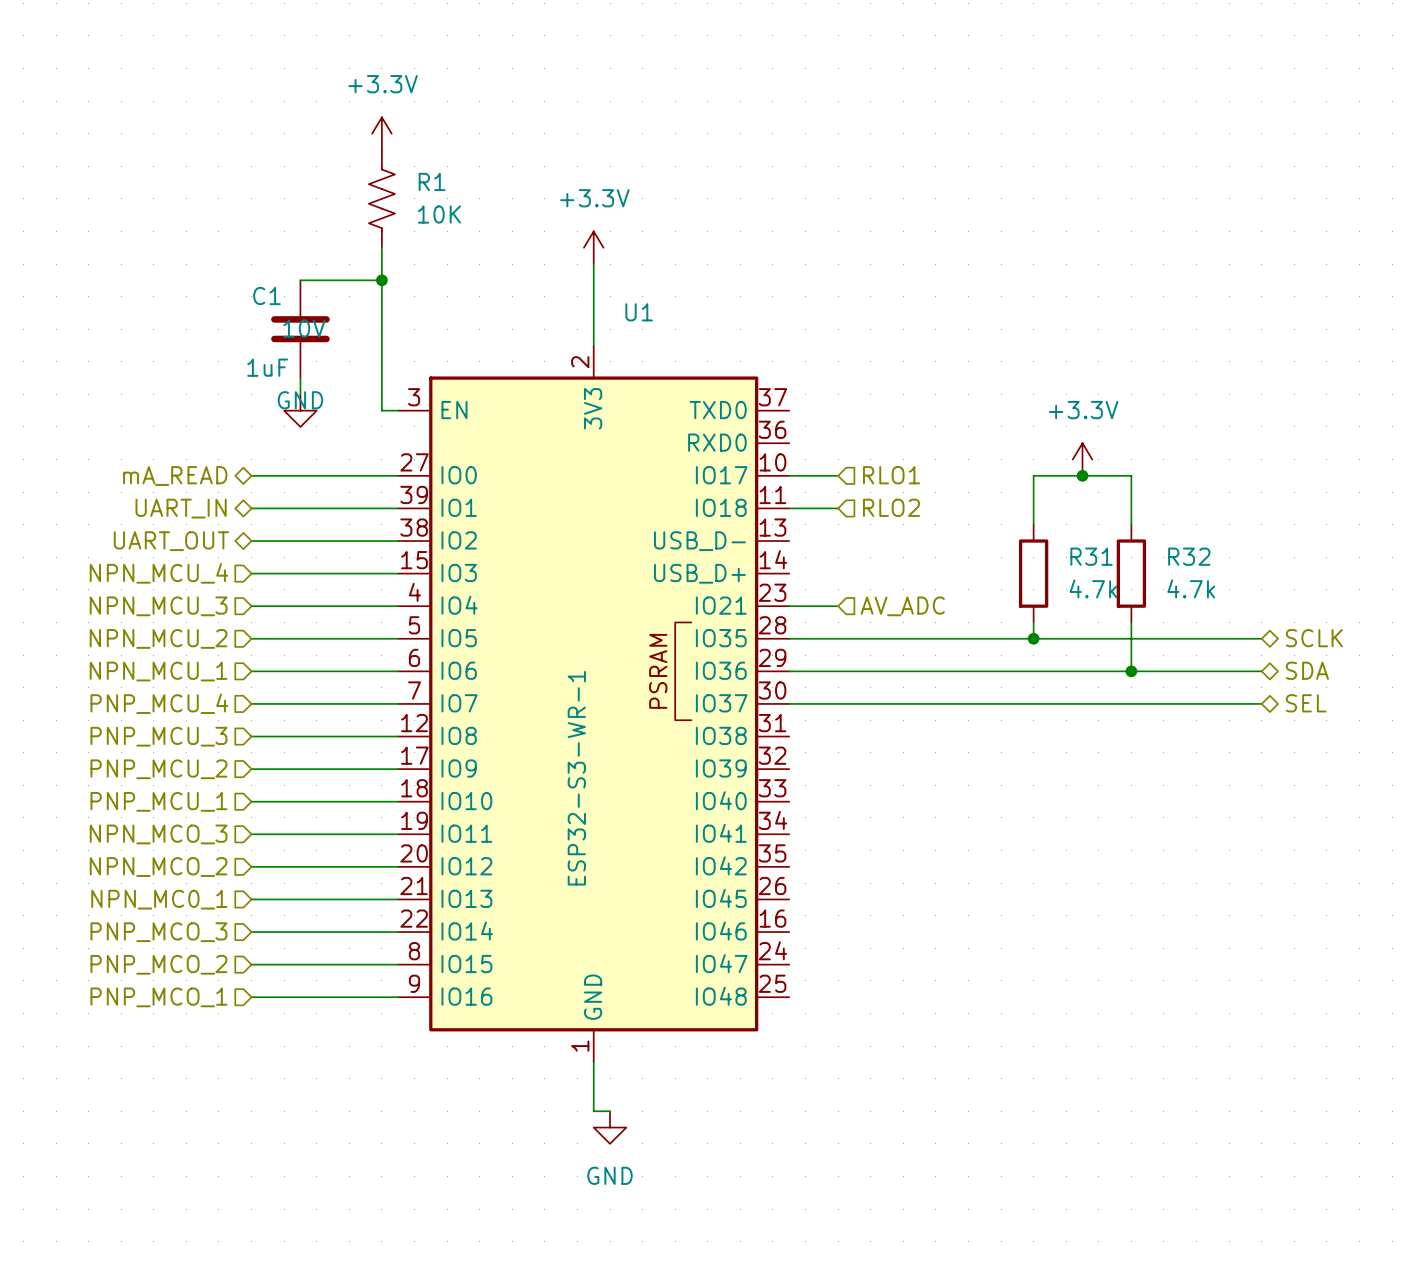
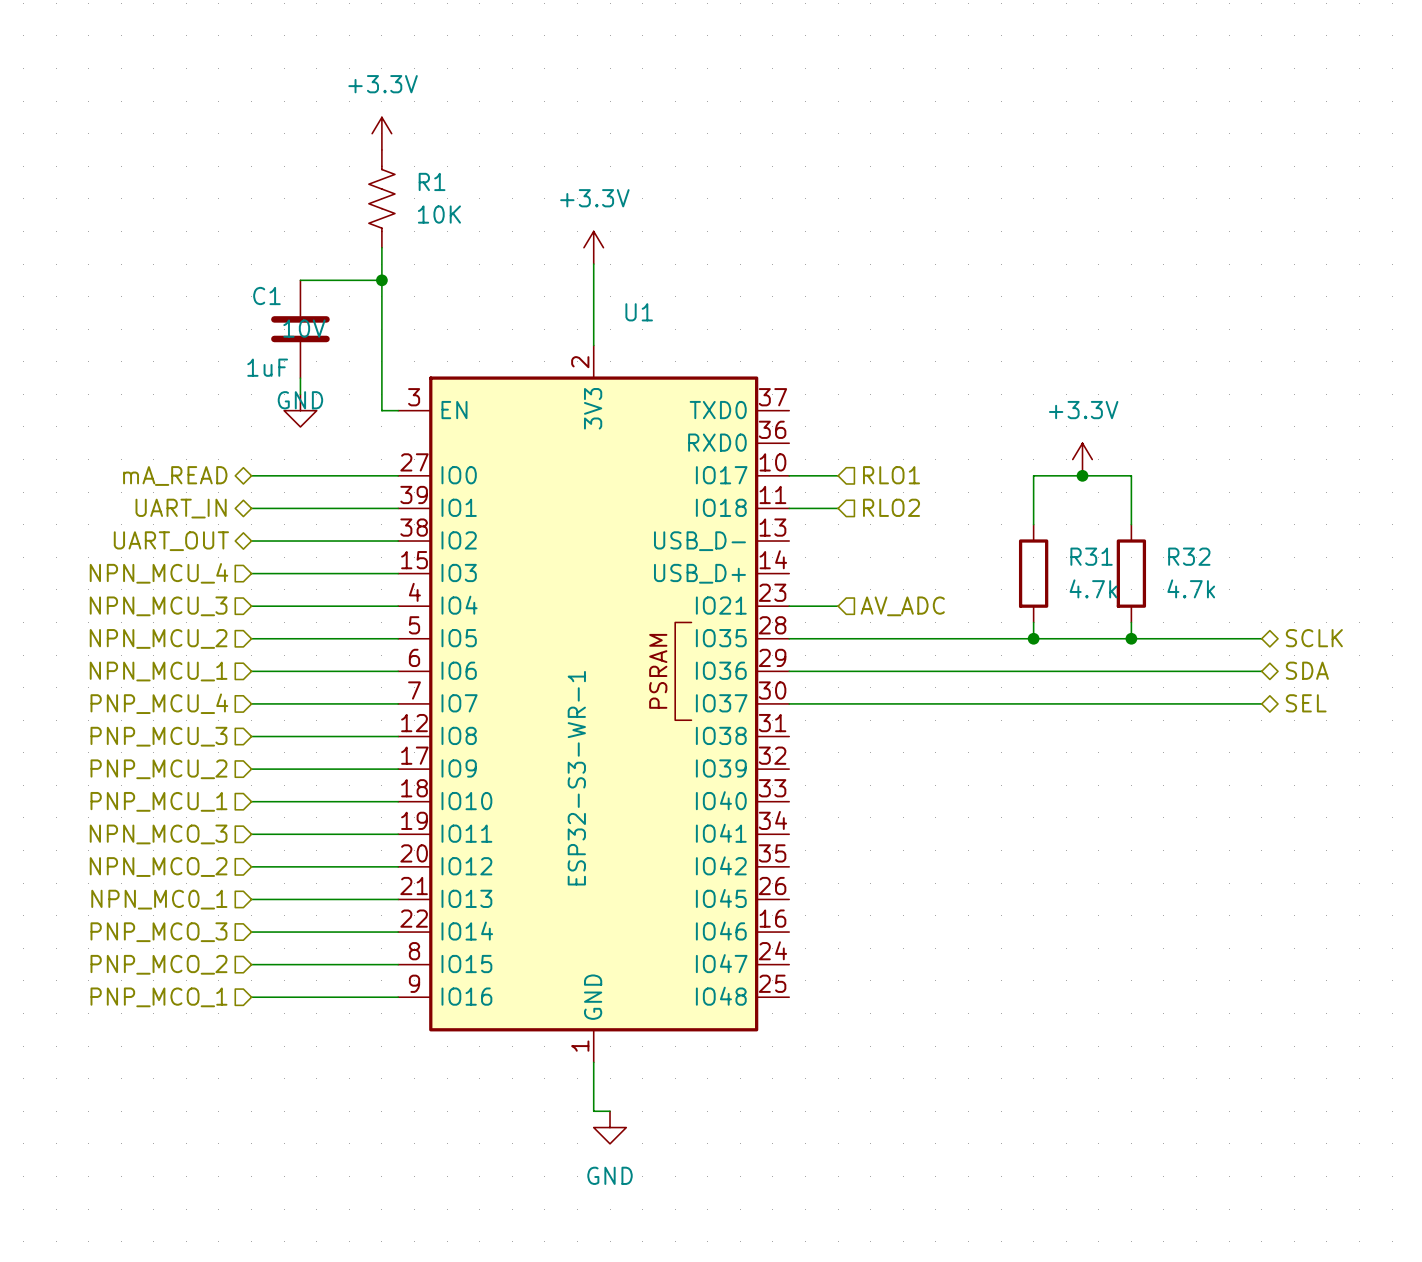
wire: (1131, 638) (1131, 671) -> none
junction position: (1131, 671) -> (1131, 638)

